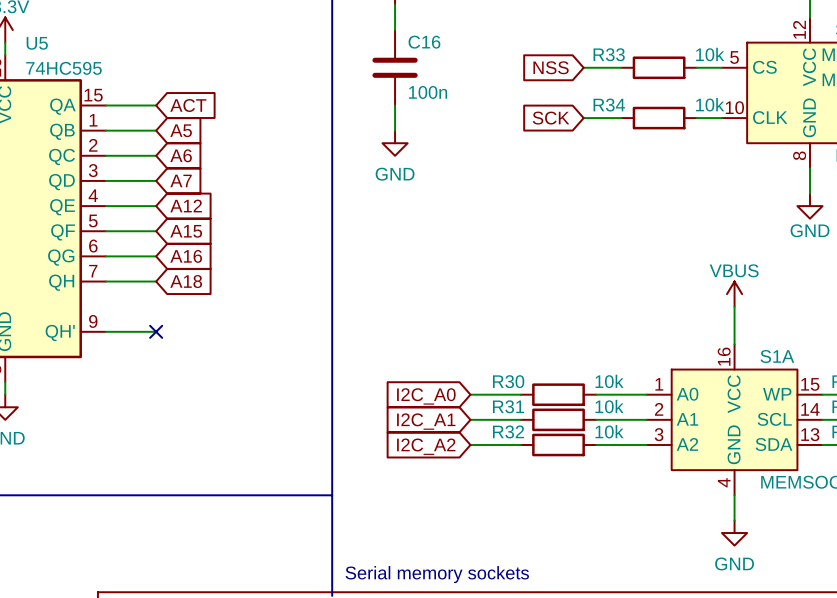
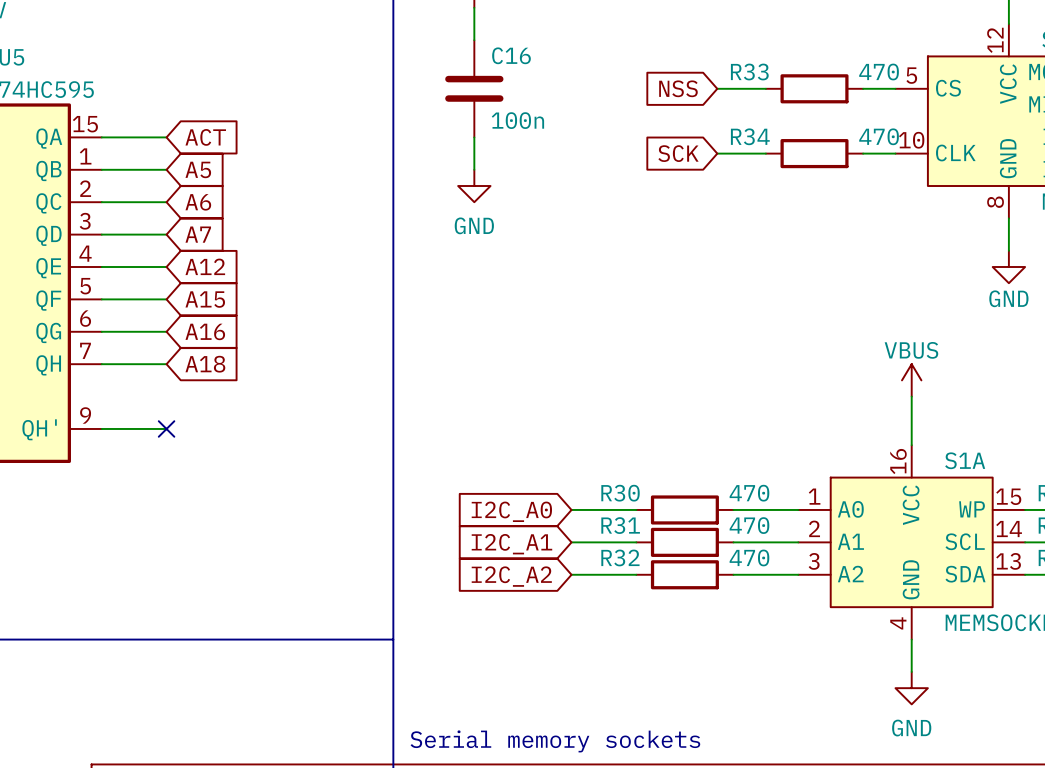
R33 value: 10k (710, 54) -> 470 (879, 72)
R34 value: 10k (710, 104) -> 470 (879, 136)
R30 value: 10k (609, 381) -> 470 (749, 493)
R31 value: 10k (609, 406) -> 470 (749, 525)
R32 value: 10k (609, 431) -> 470 (749, 557)

